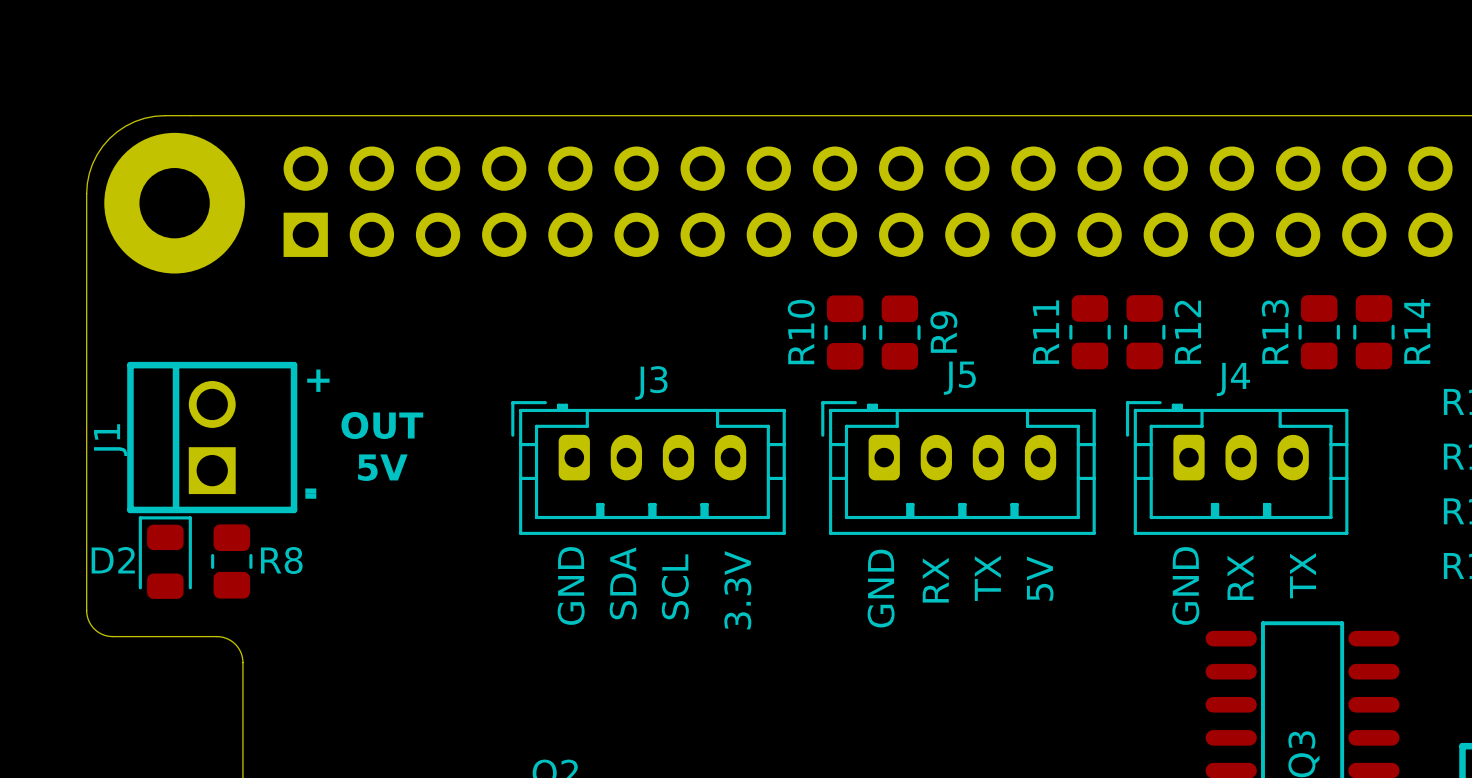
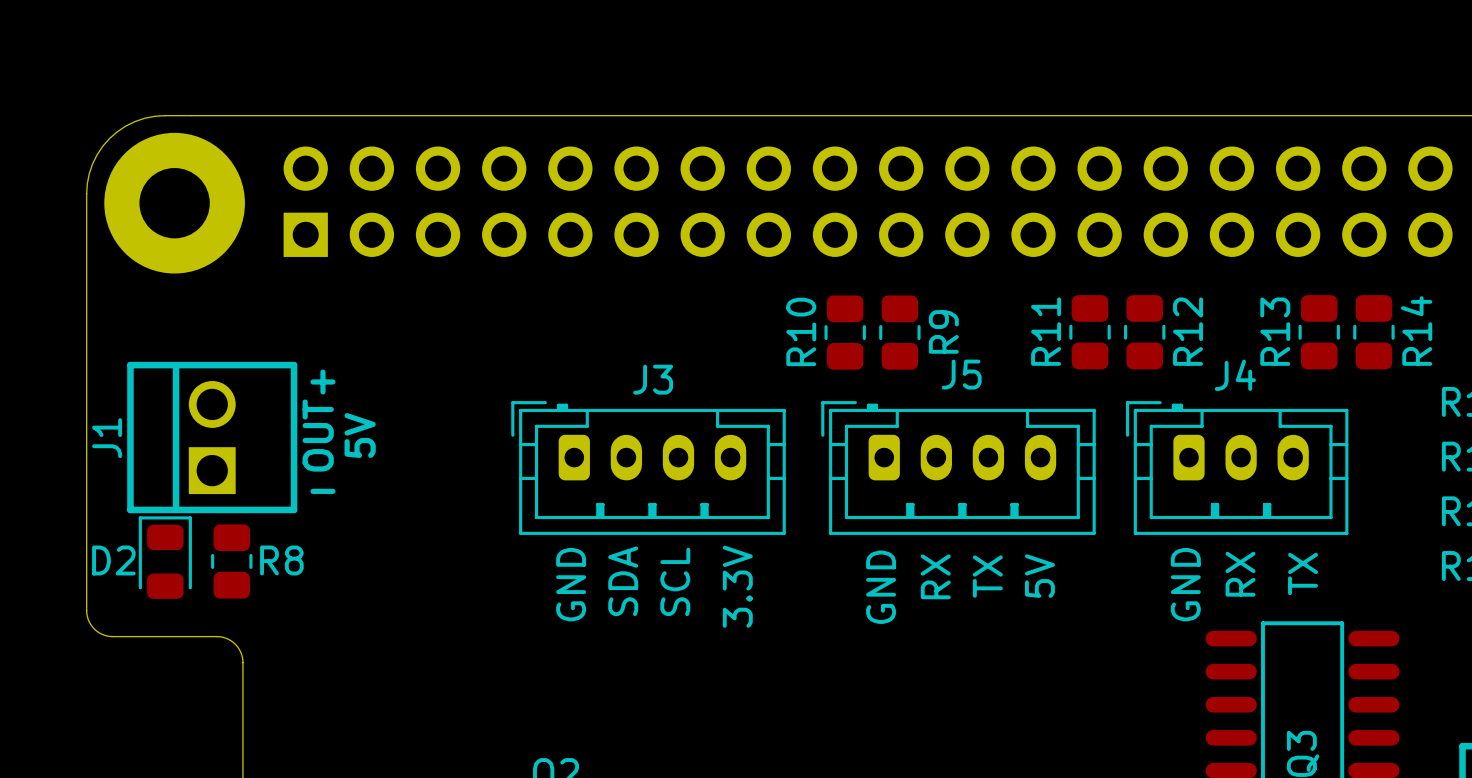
text: OUT (382, 425) -> 5V (360, 435)
text: none -> OUT (318, 435)
text: 5V (382, 467) -> none
text: - (310, 496) -> none

